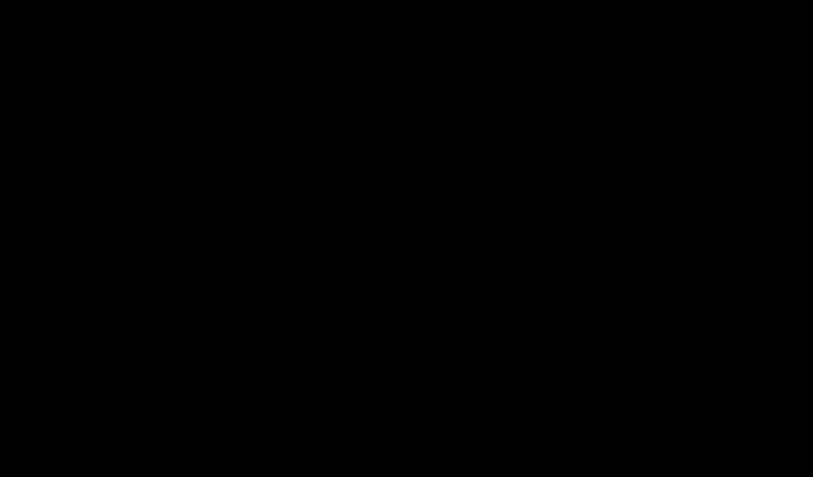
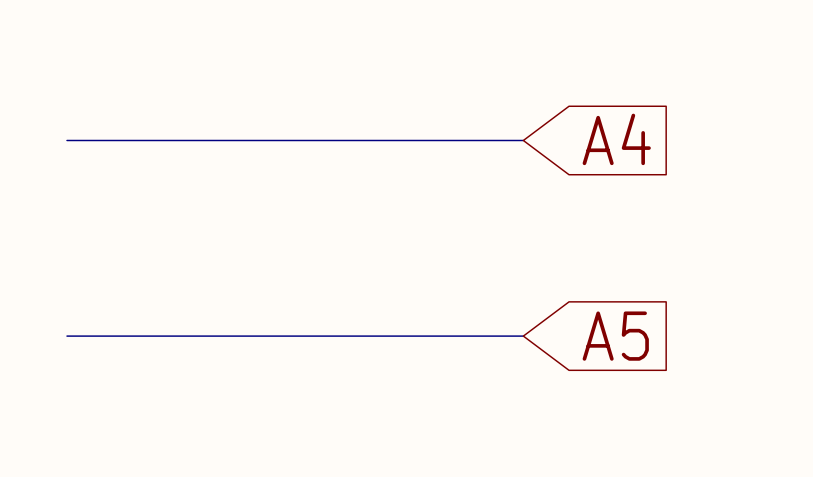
wire: none -> (66, 140) (523, 140)
global label: none -> A4 (616, 139)
wire: none -> (66, 336) (523, 336)
global label: none -> A5 (615, 336)

